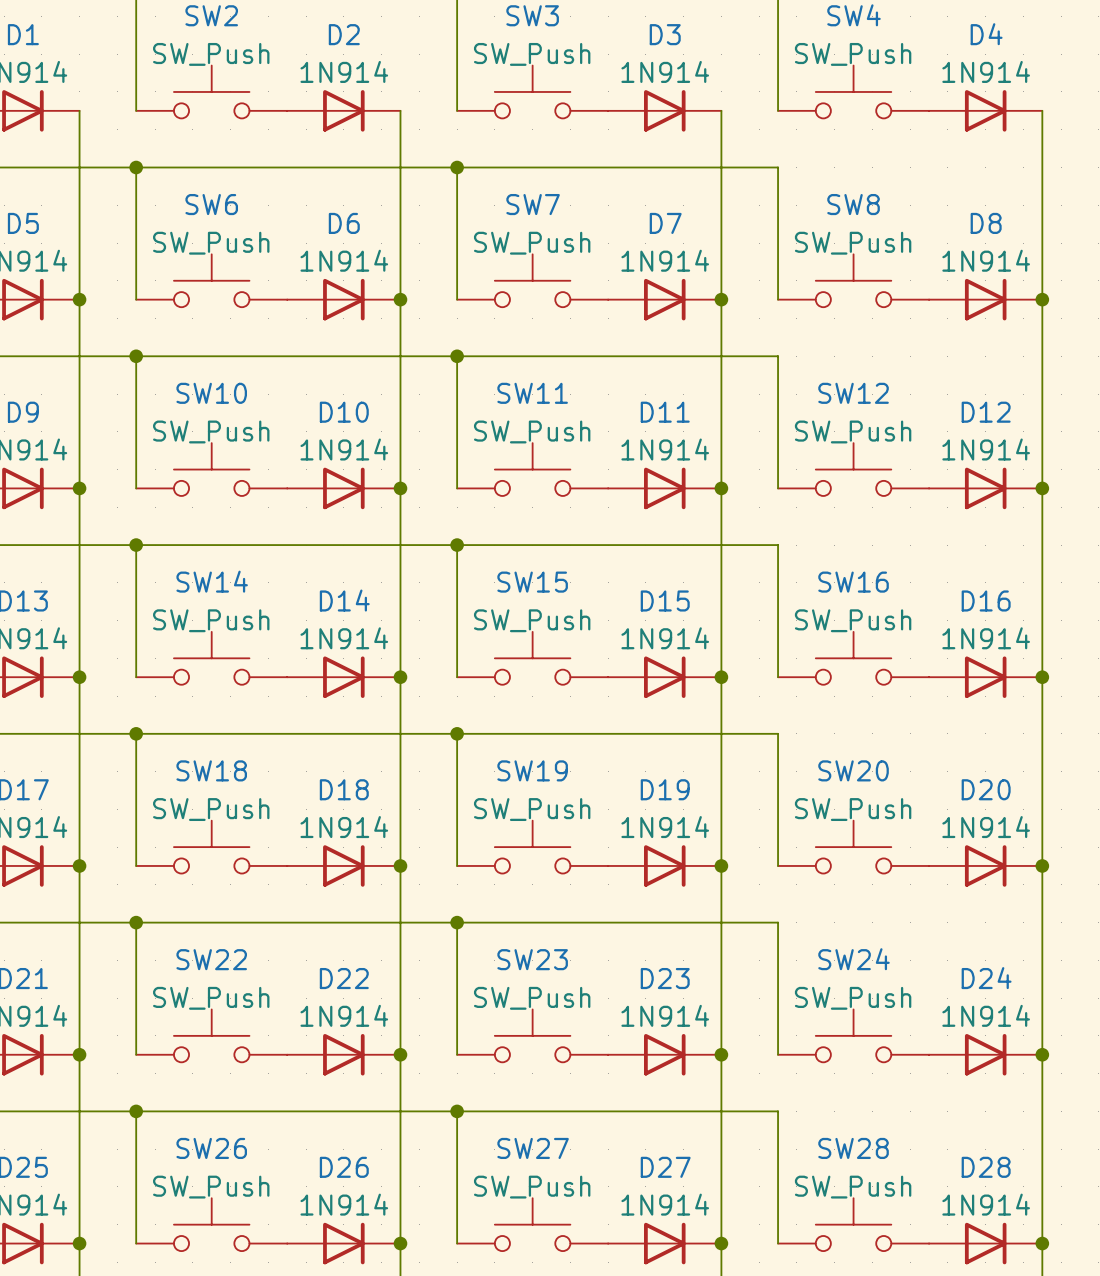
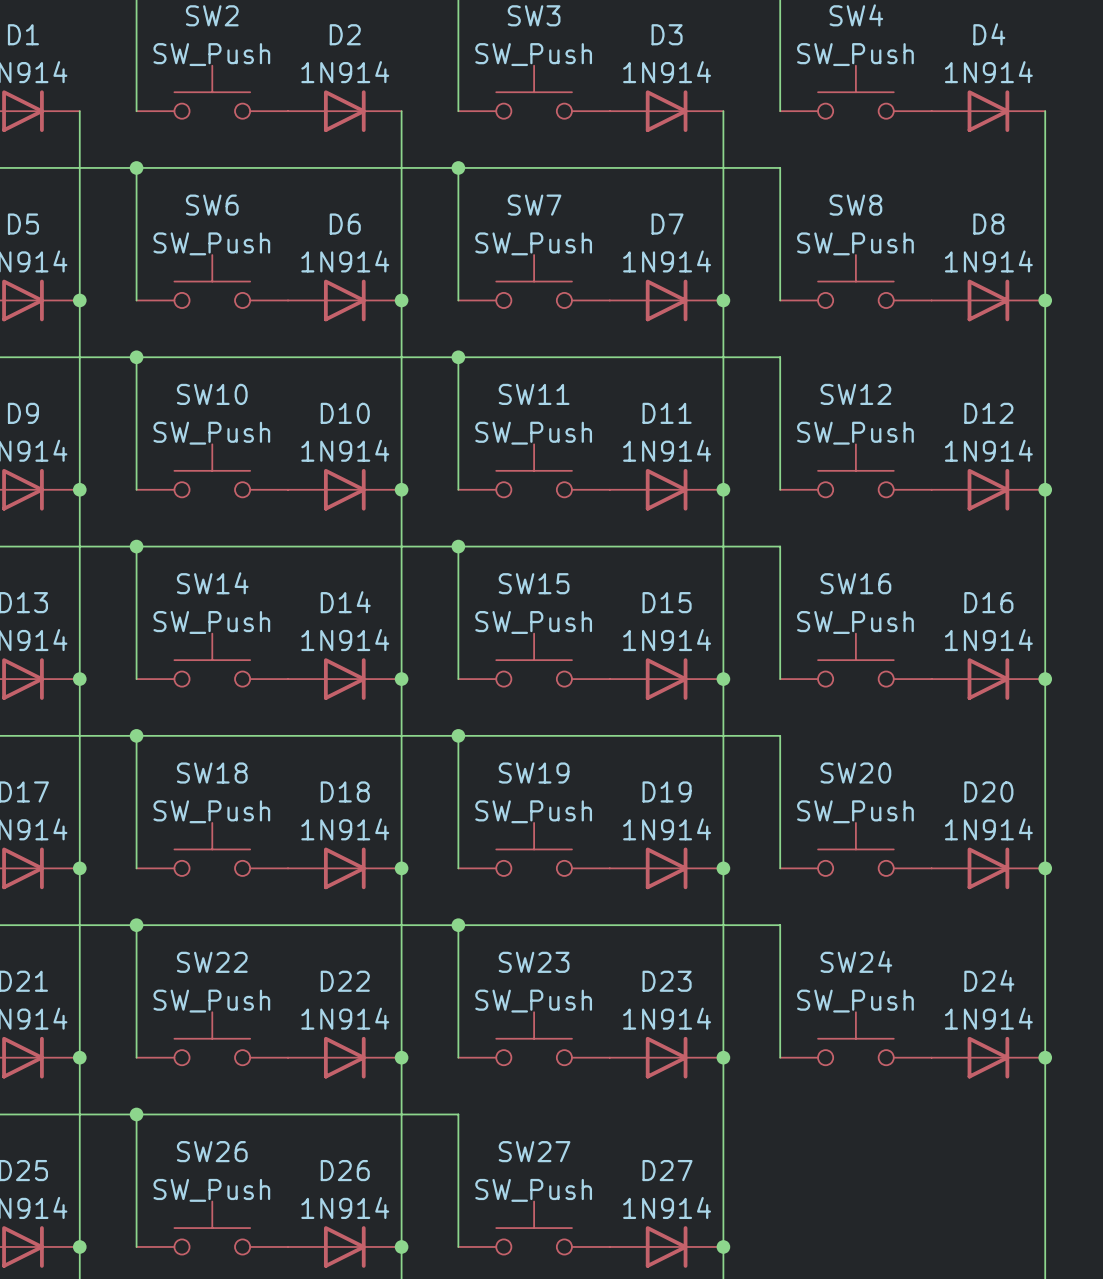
wire: (457, 1111) (778, 1111) (778, 1243) -> none
junction: (457, 1111) -> none
SW28: SW_Push (853, 1224) -> none
D28: 1N914 (985, 1243) -> none
junction: (1042, 1243) -> none

